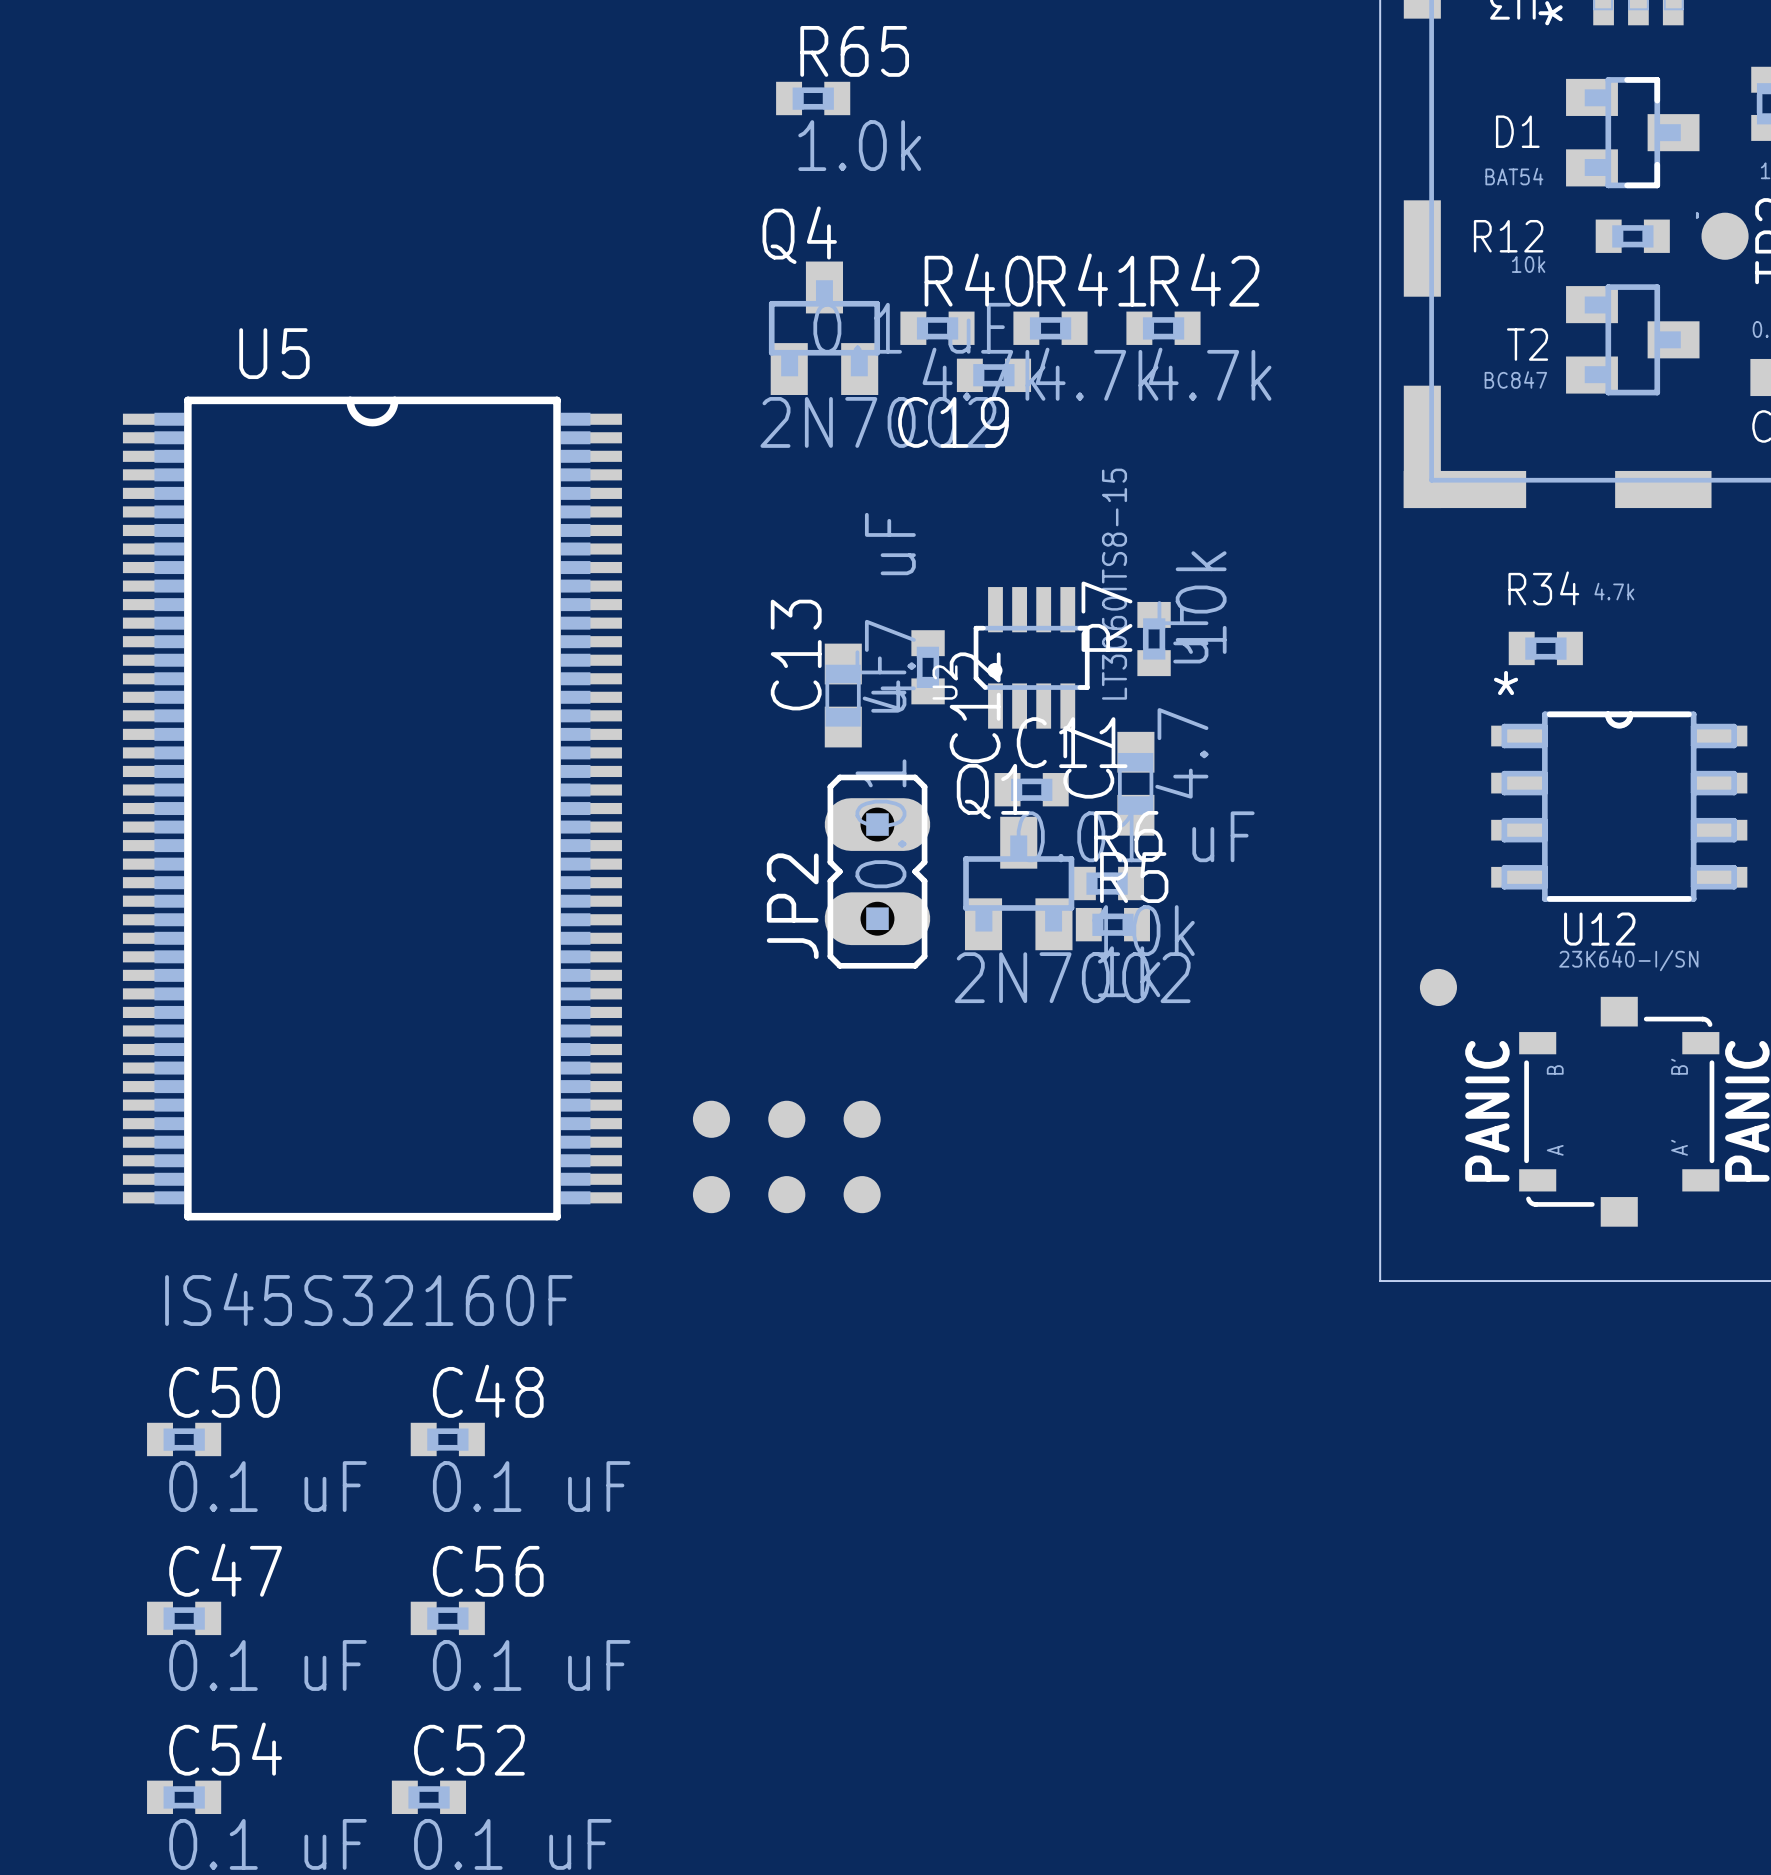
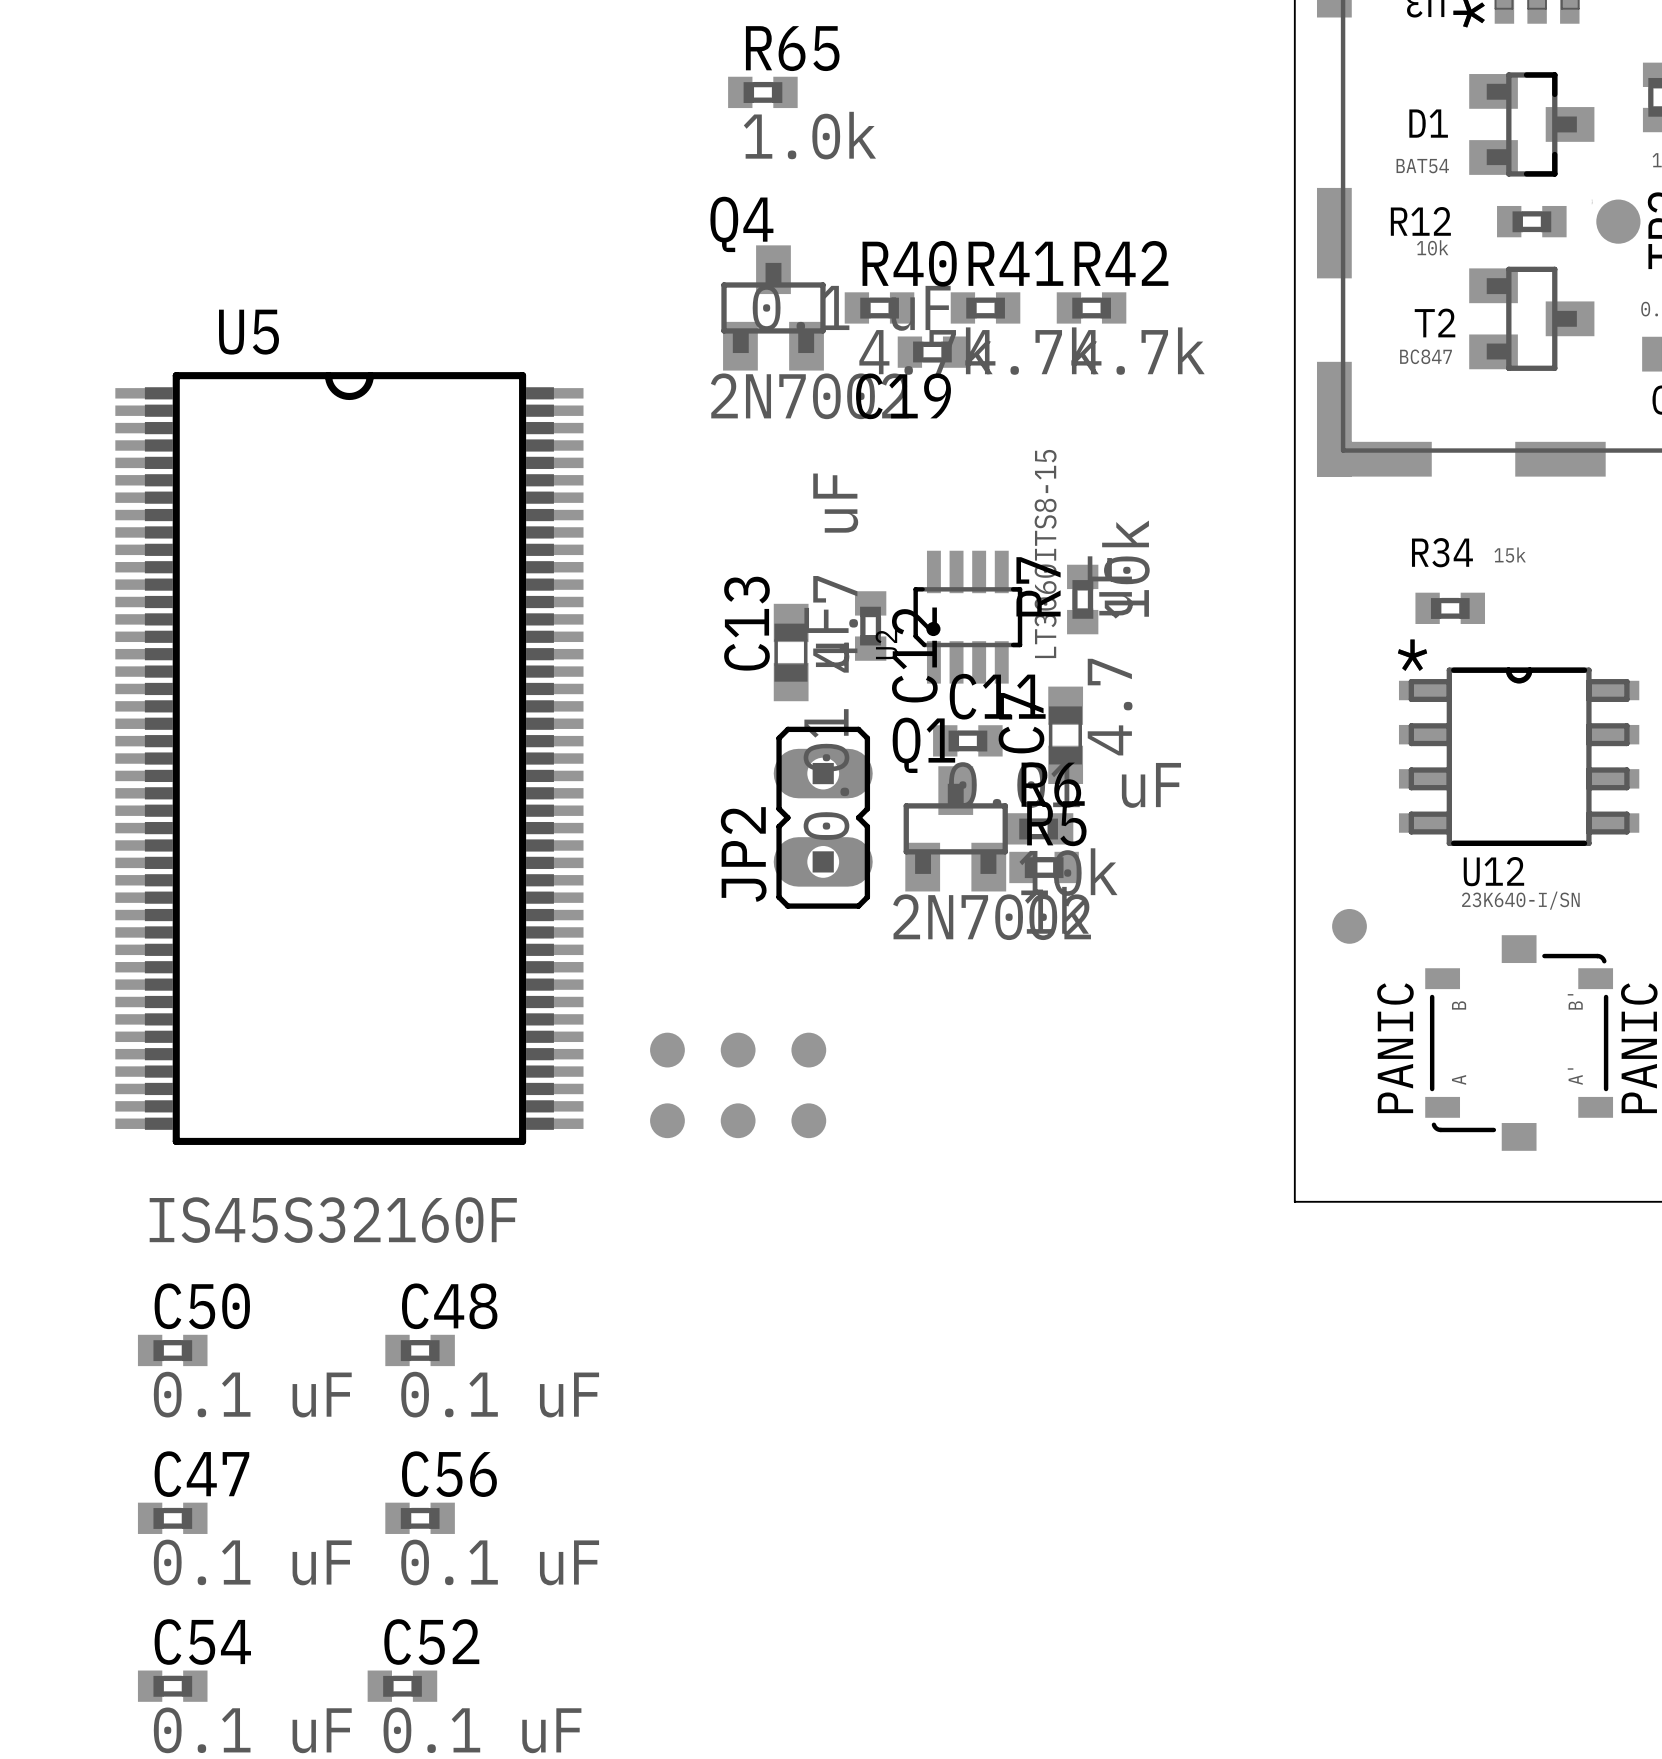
R34 value: 4.7k (1614, 591) -> 15k (1510, 555)

